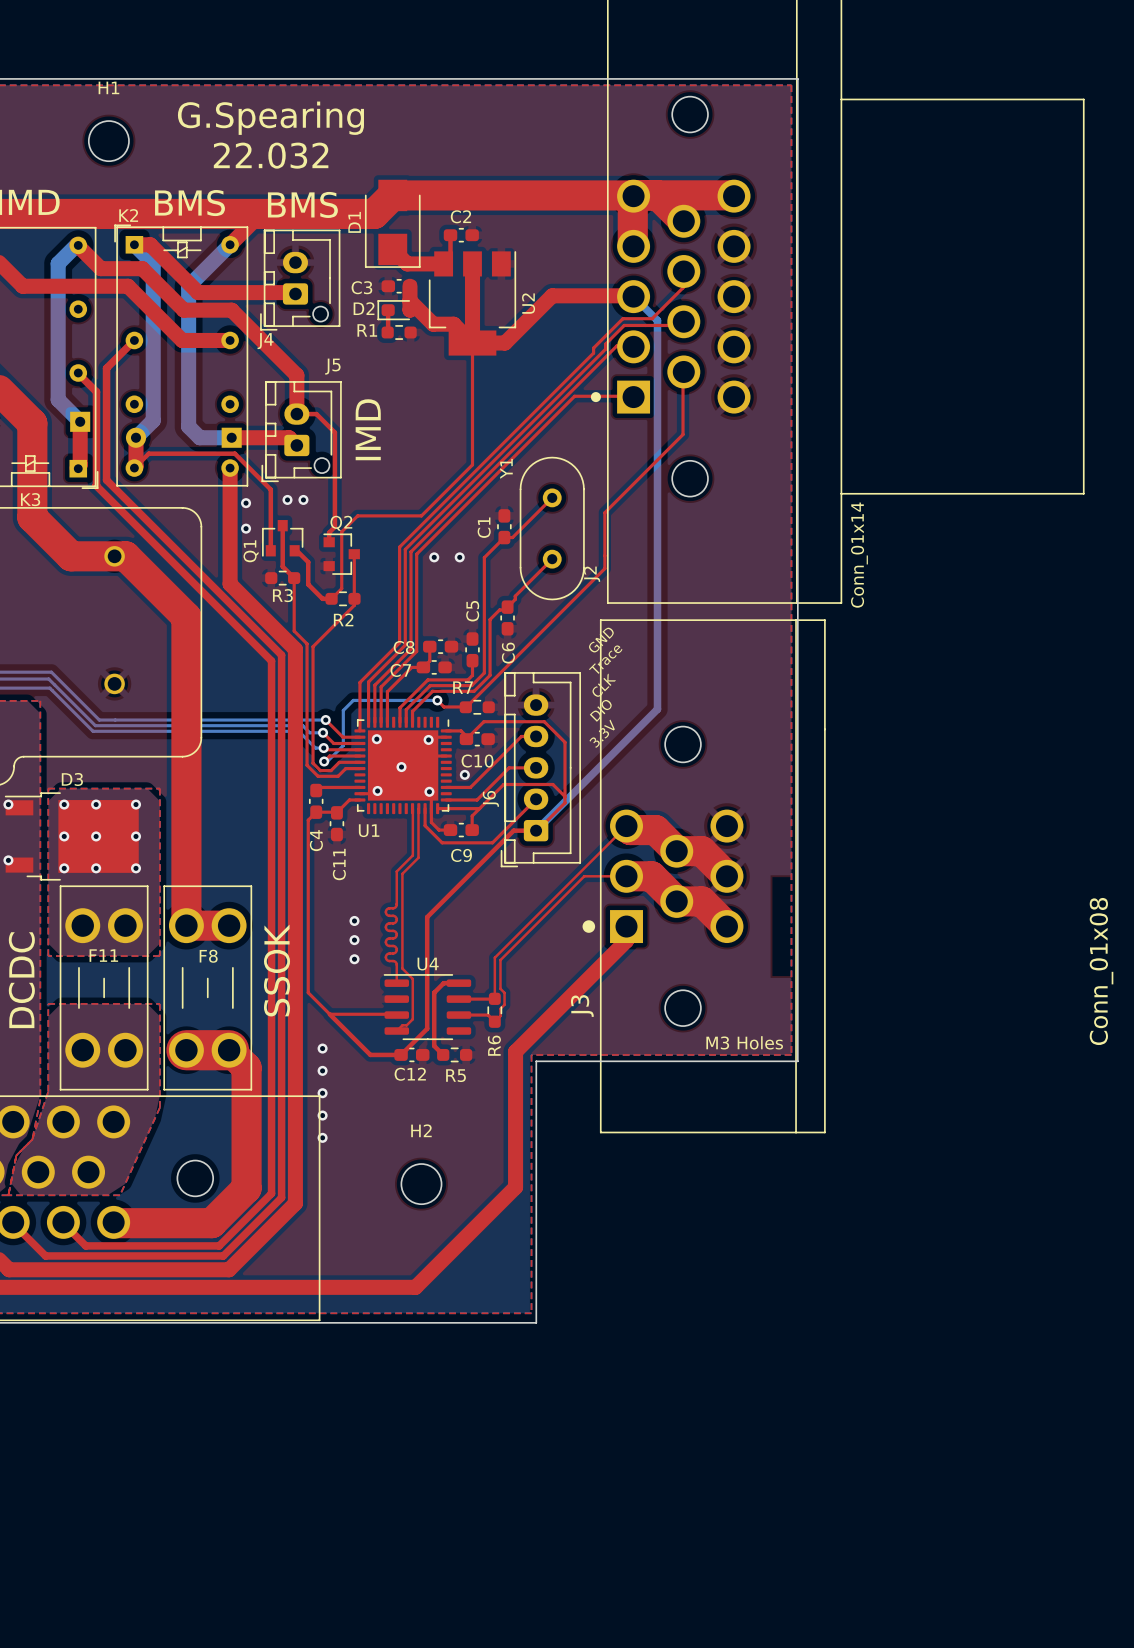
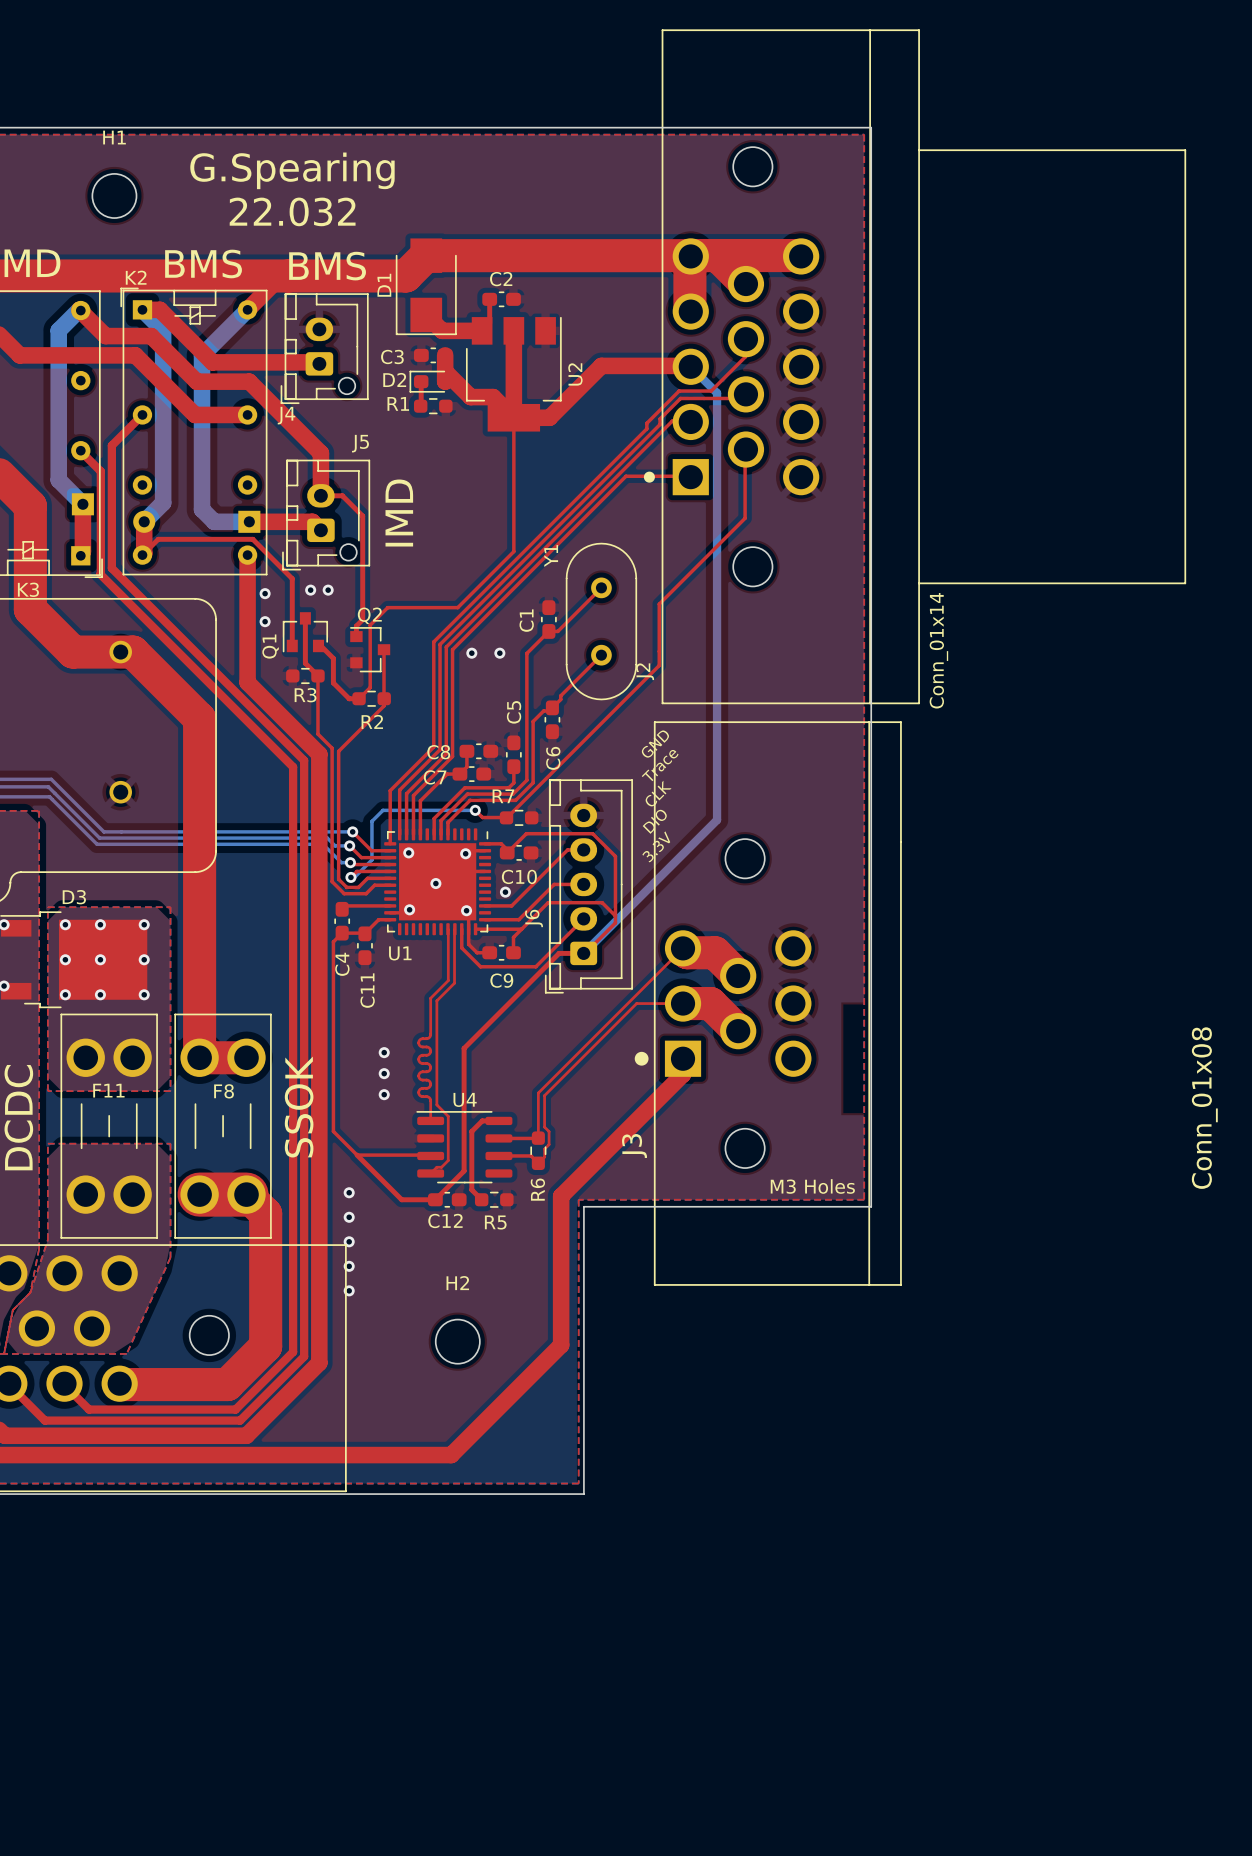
top track: (676, 851) (701, 851) (726, 876) -> none
top track: (676, 901) (701, 901) (726, 926) -> none

